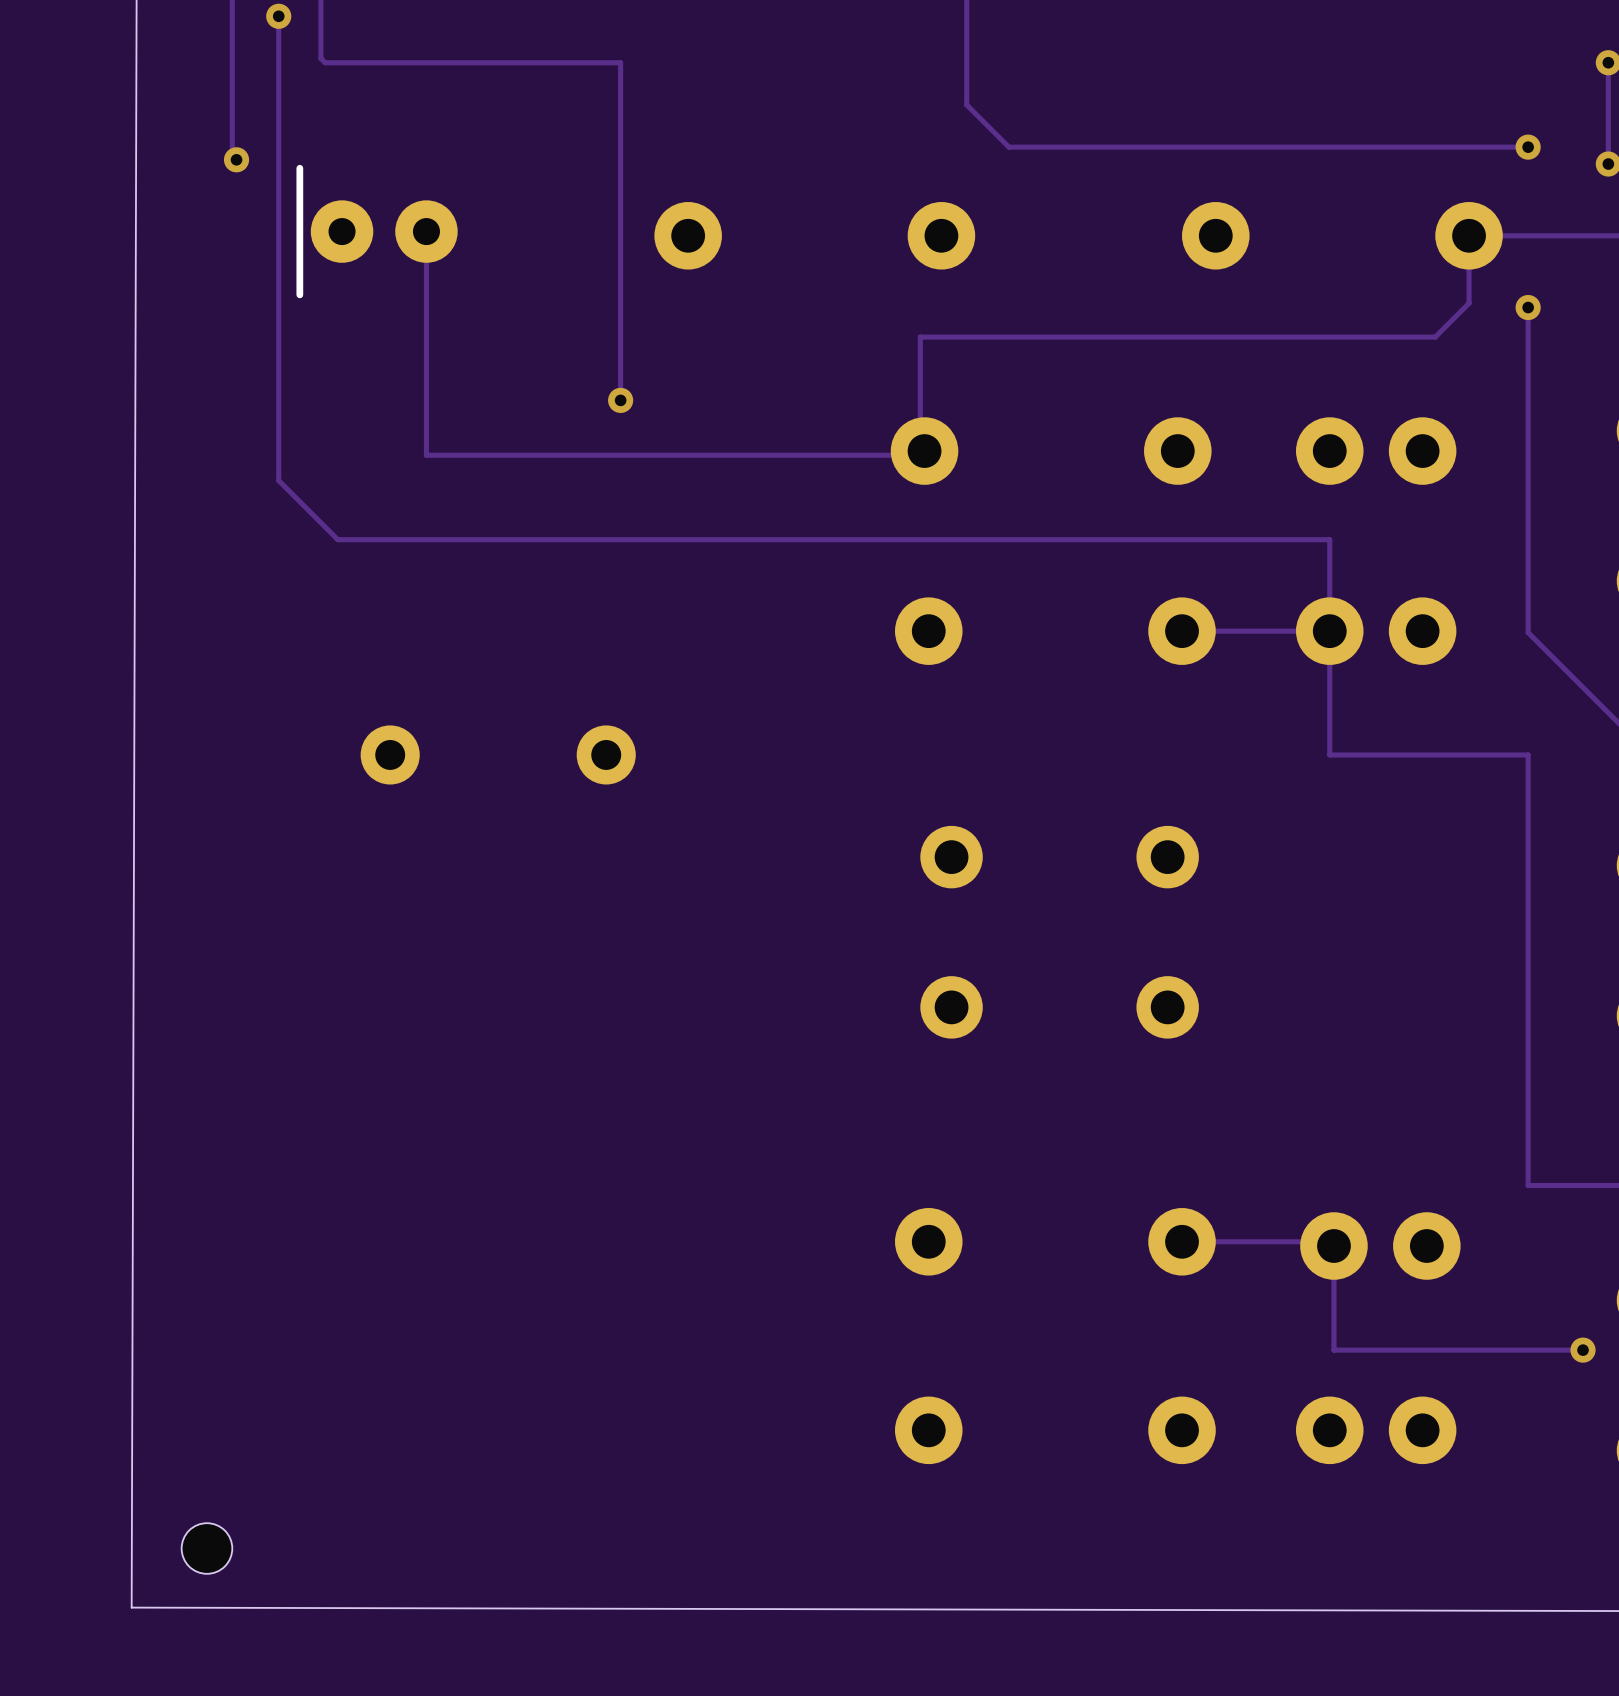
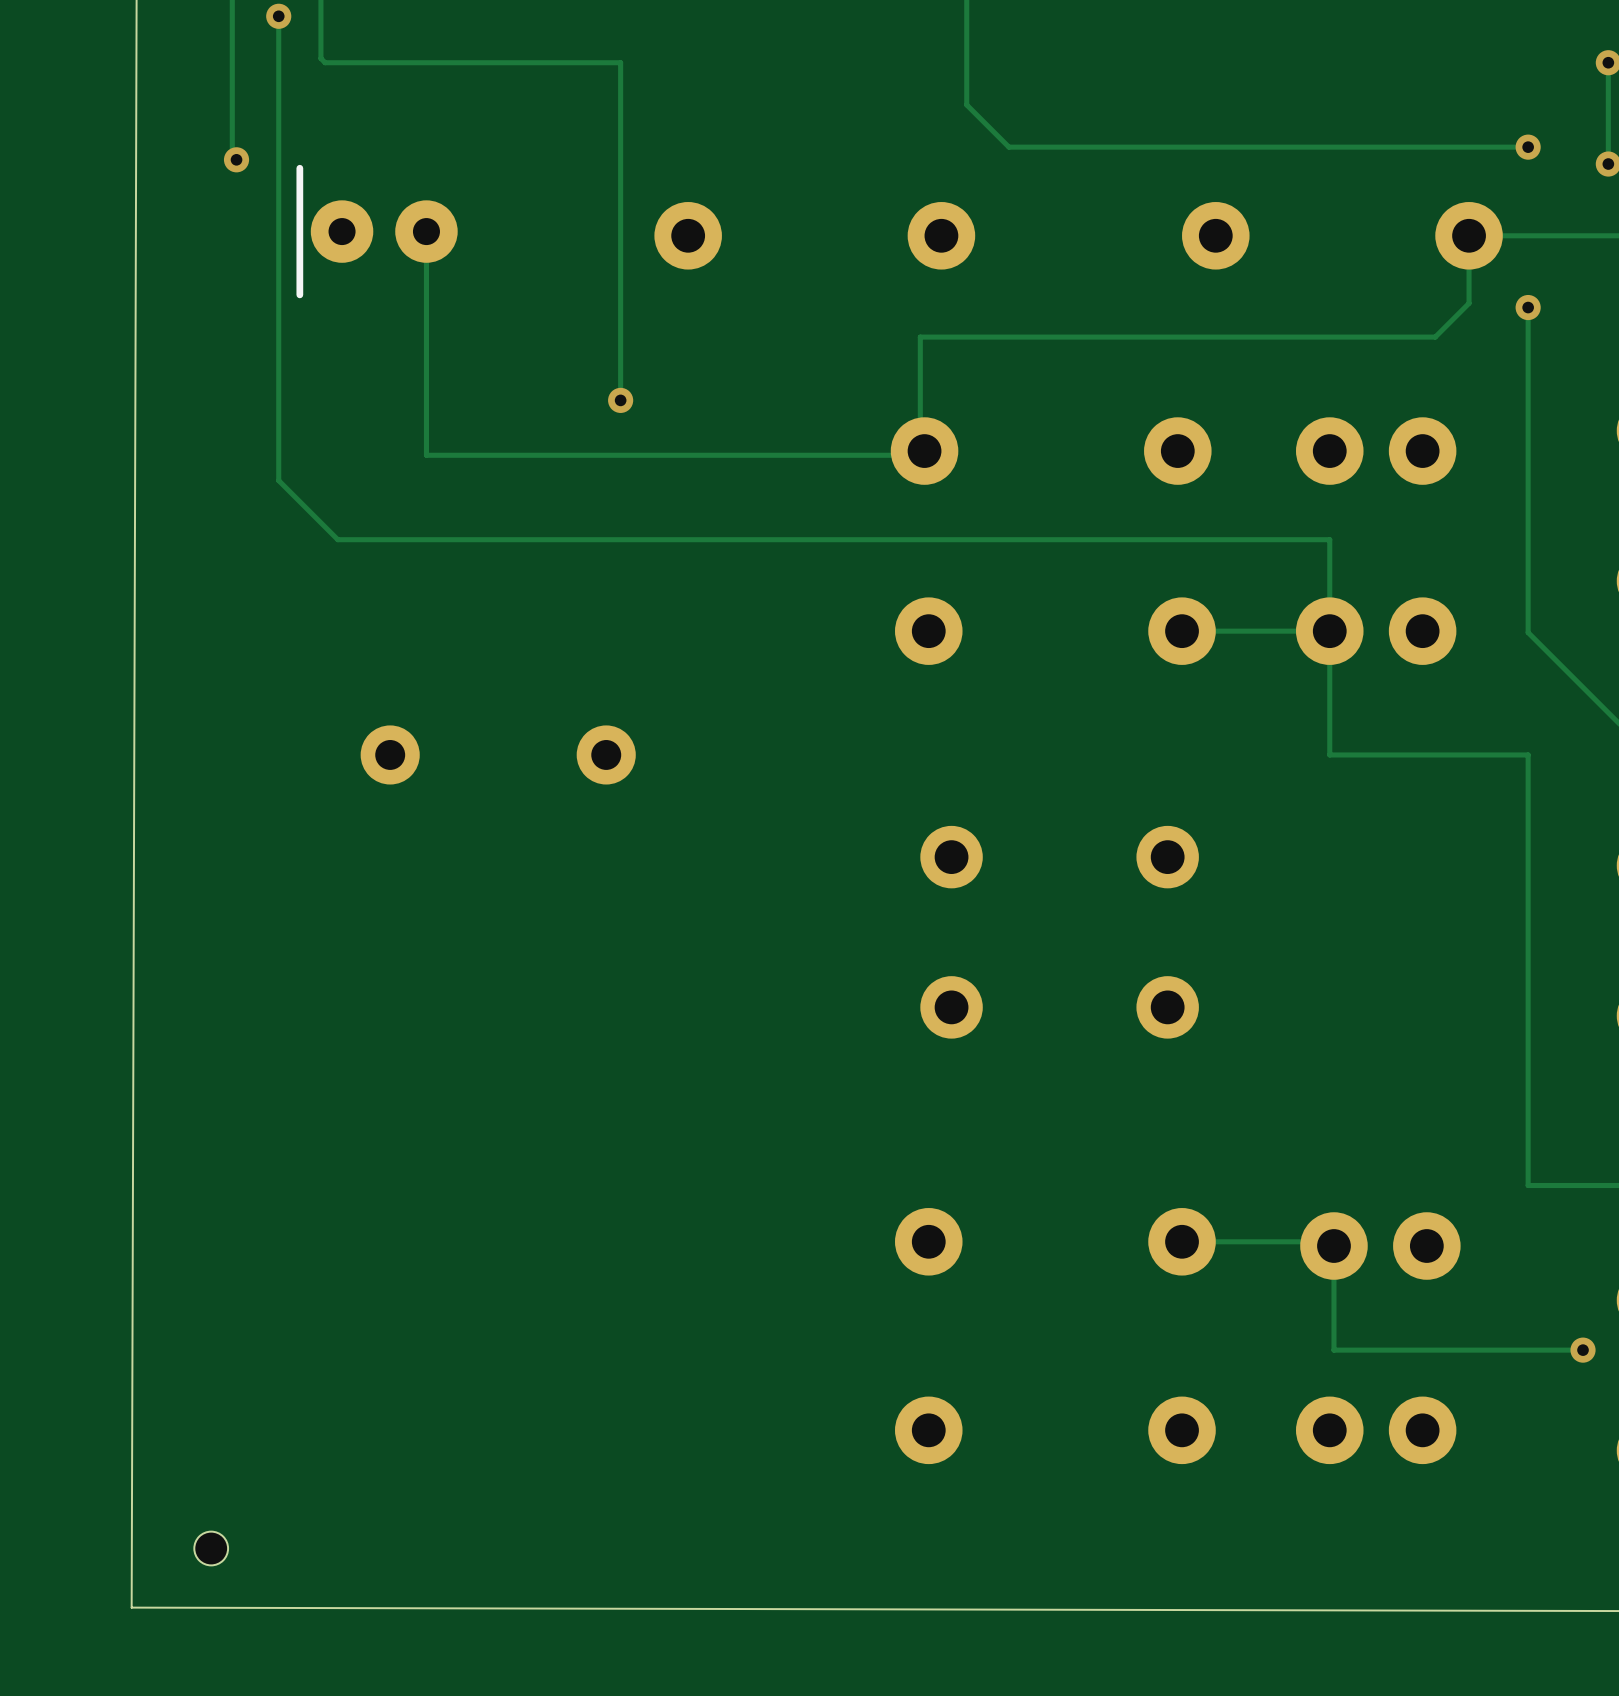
hole size: [181, 1523, 233, 1574] -> [194, 1531, 229, 1566]

